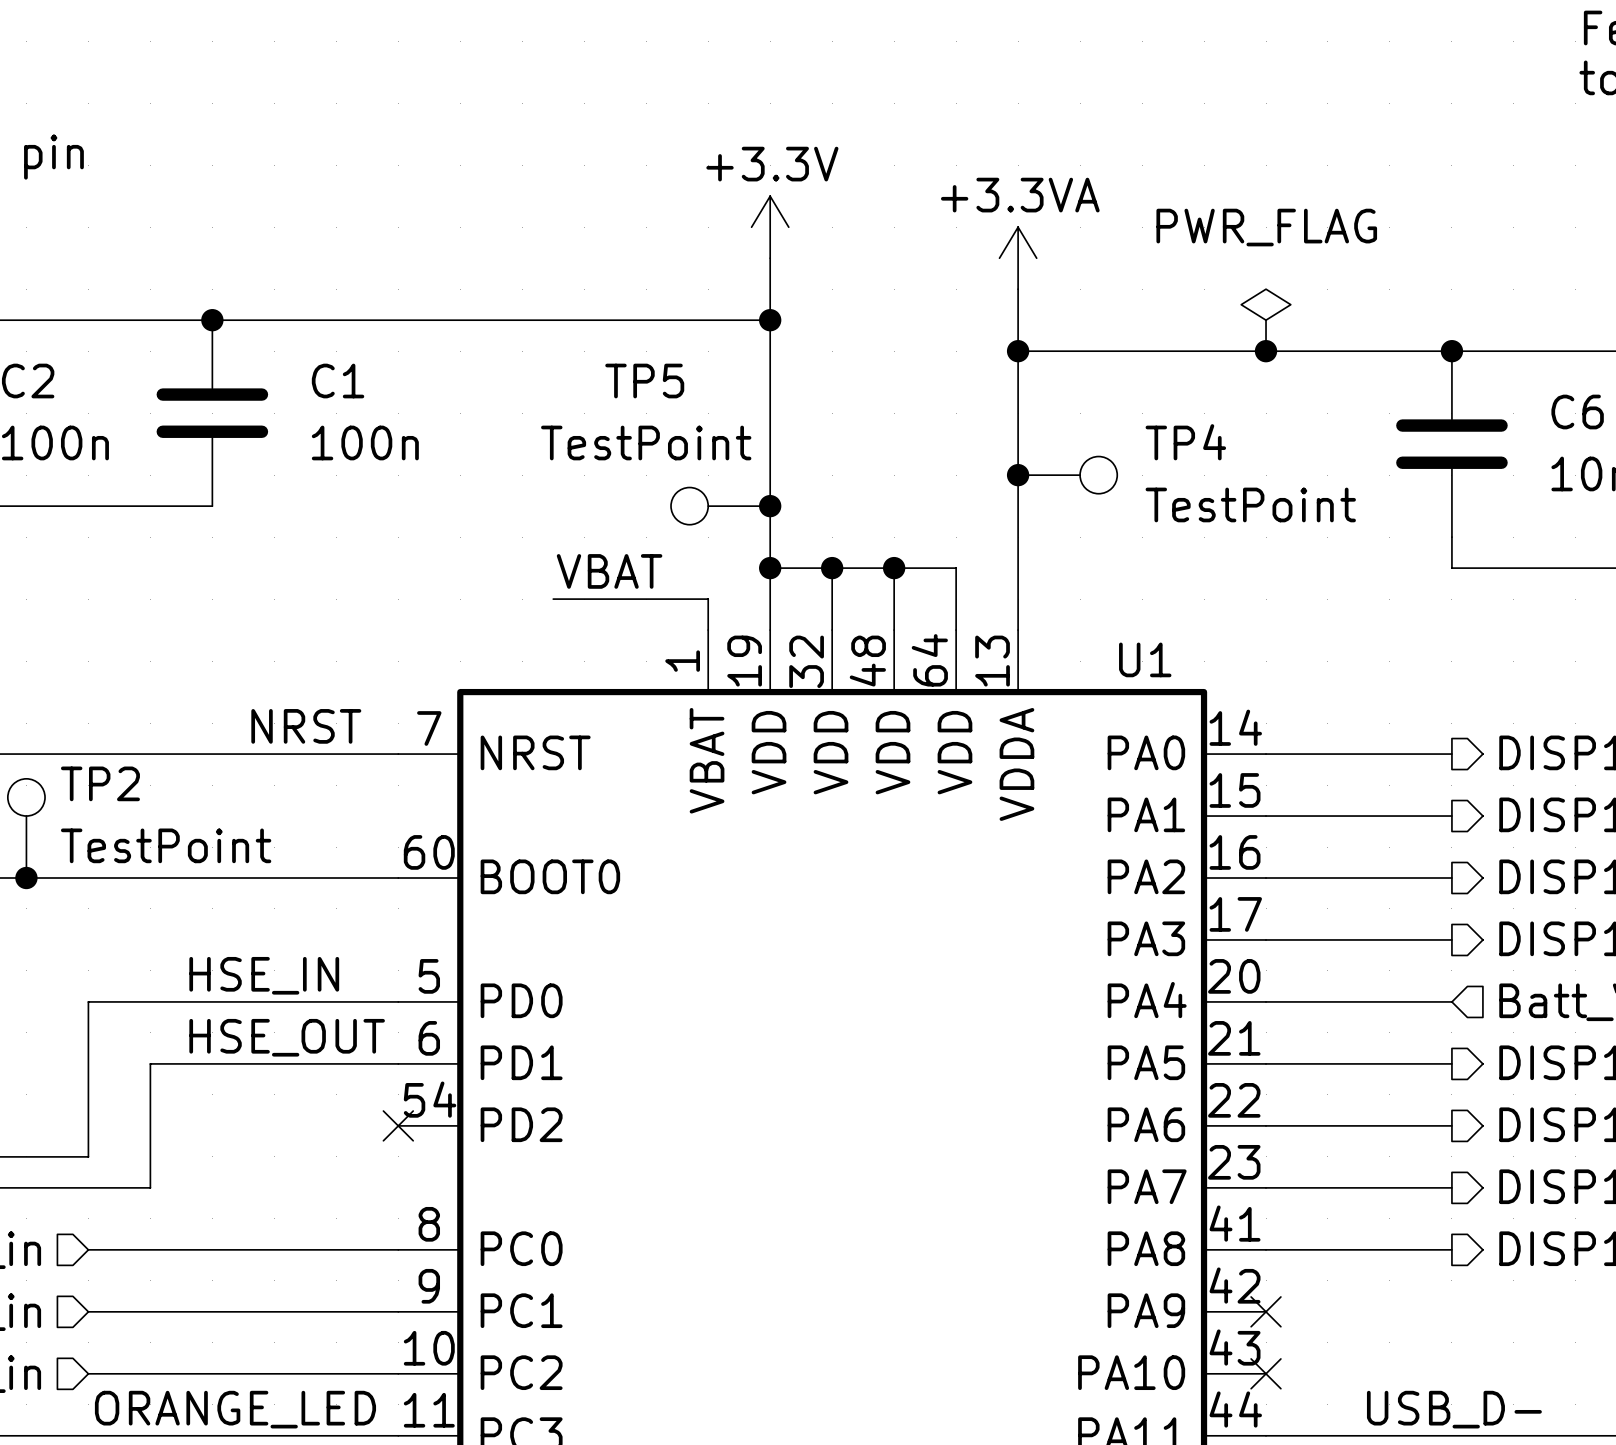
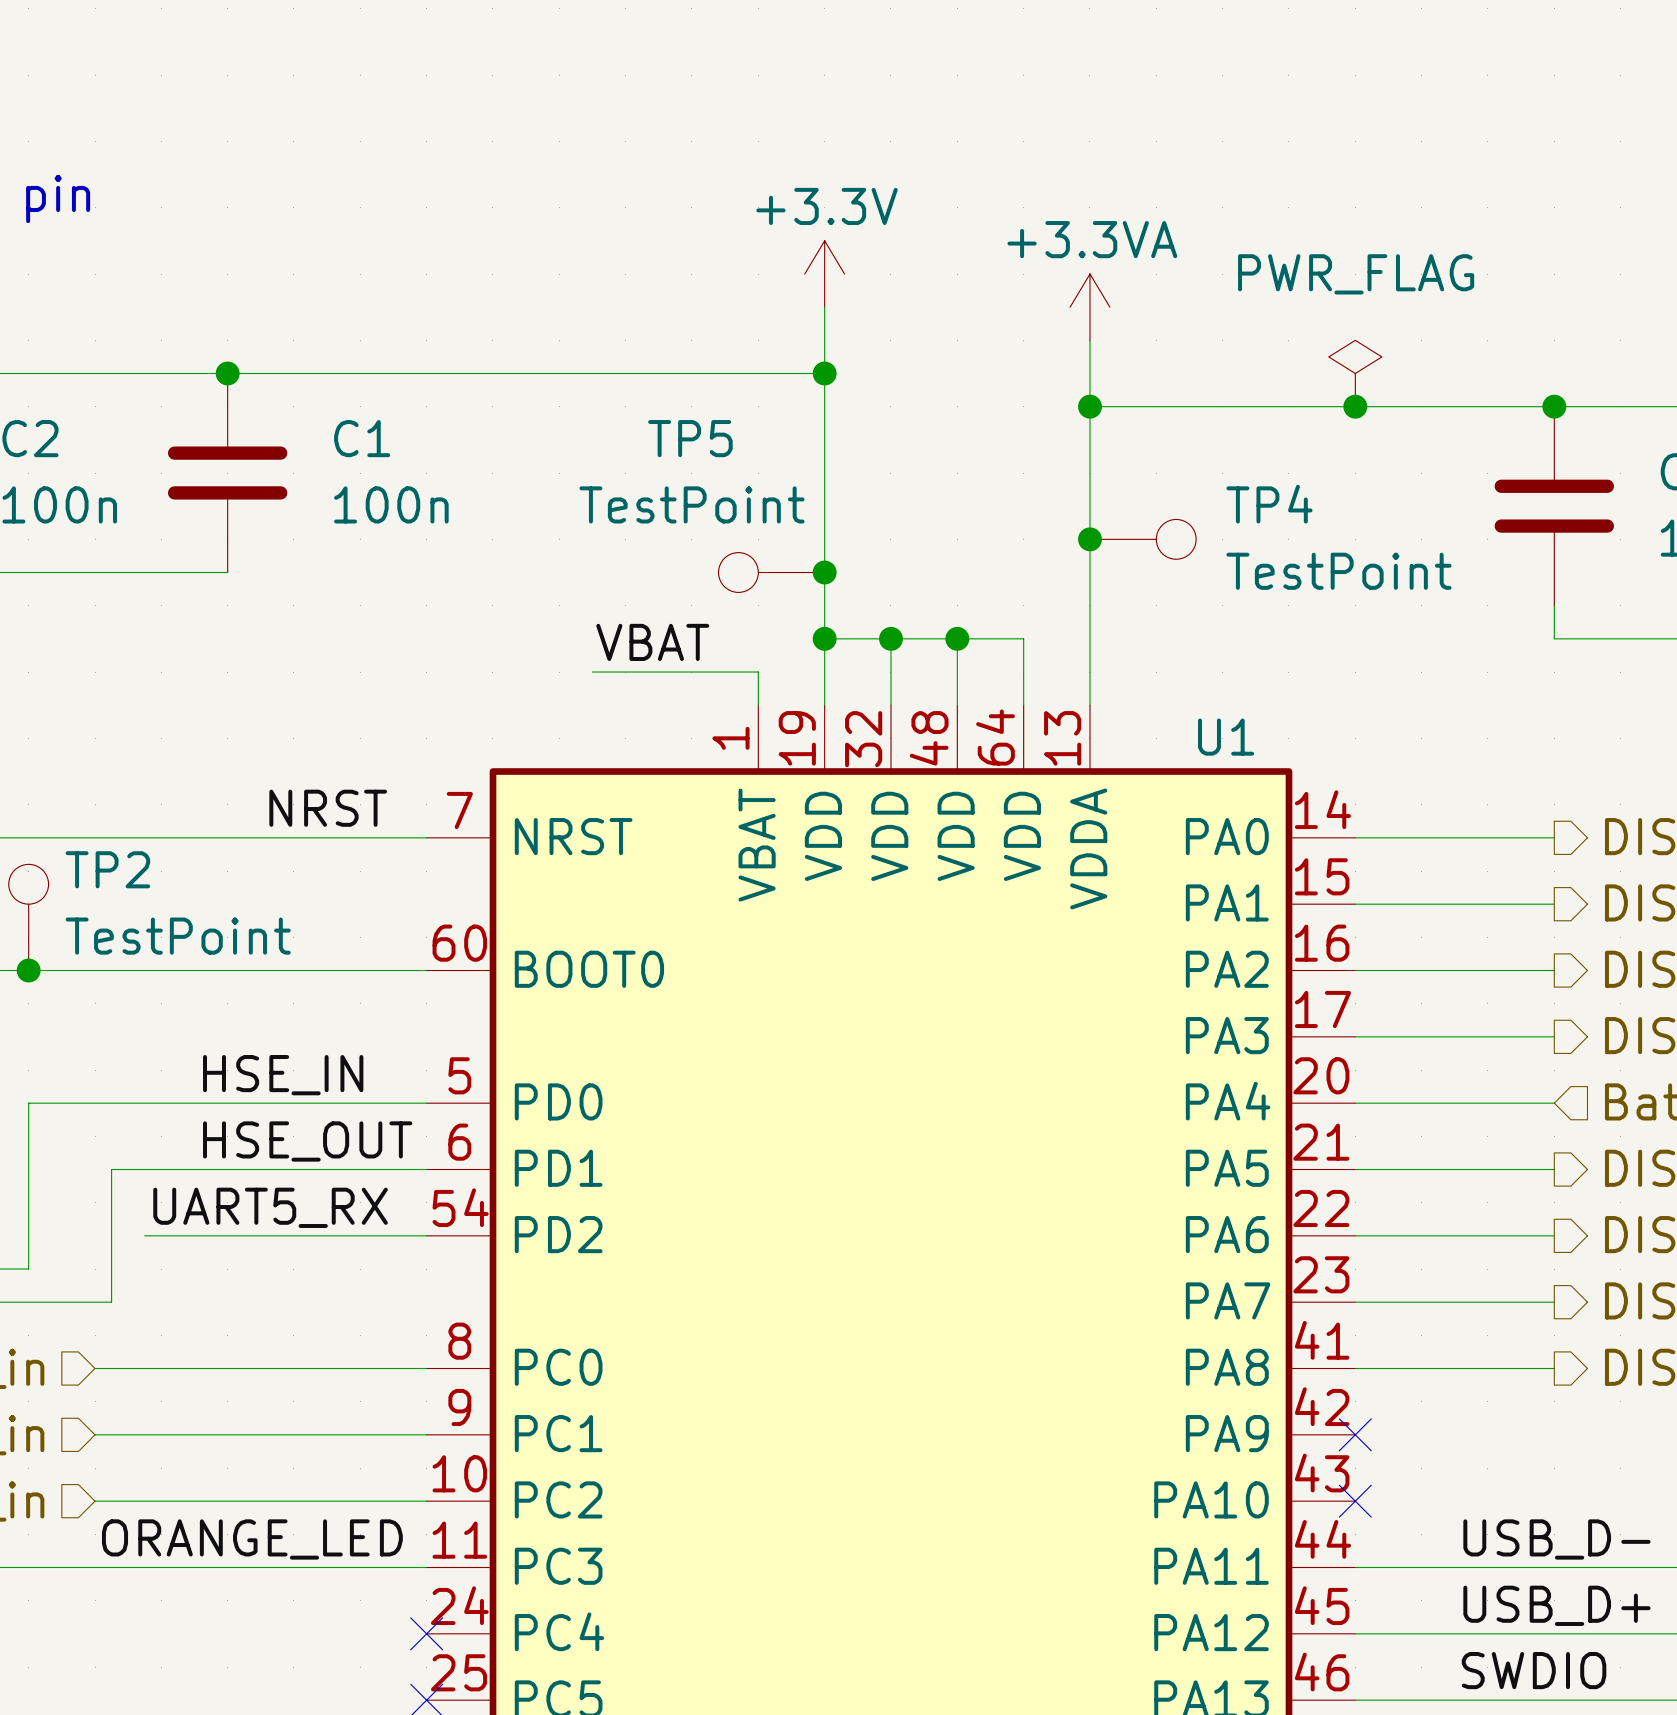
wire: (88, 1001) (88, 1156) (26, 1156) -> (95, 1103) (28, 1103) (28, 1269)
wire: (150, 1063) (150, 1187) (103, 1187) -> (161, 1169) (111, 1169) (111, 1302)
label: none -> UART5_RX (270, 1207)
wire: none -> (144, 1235) (426, 1235)
no-connect mark: (398, 1125) -> none

